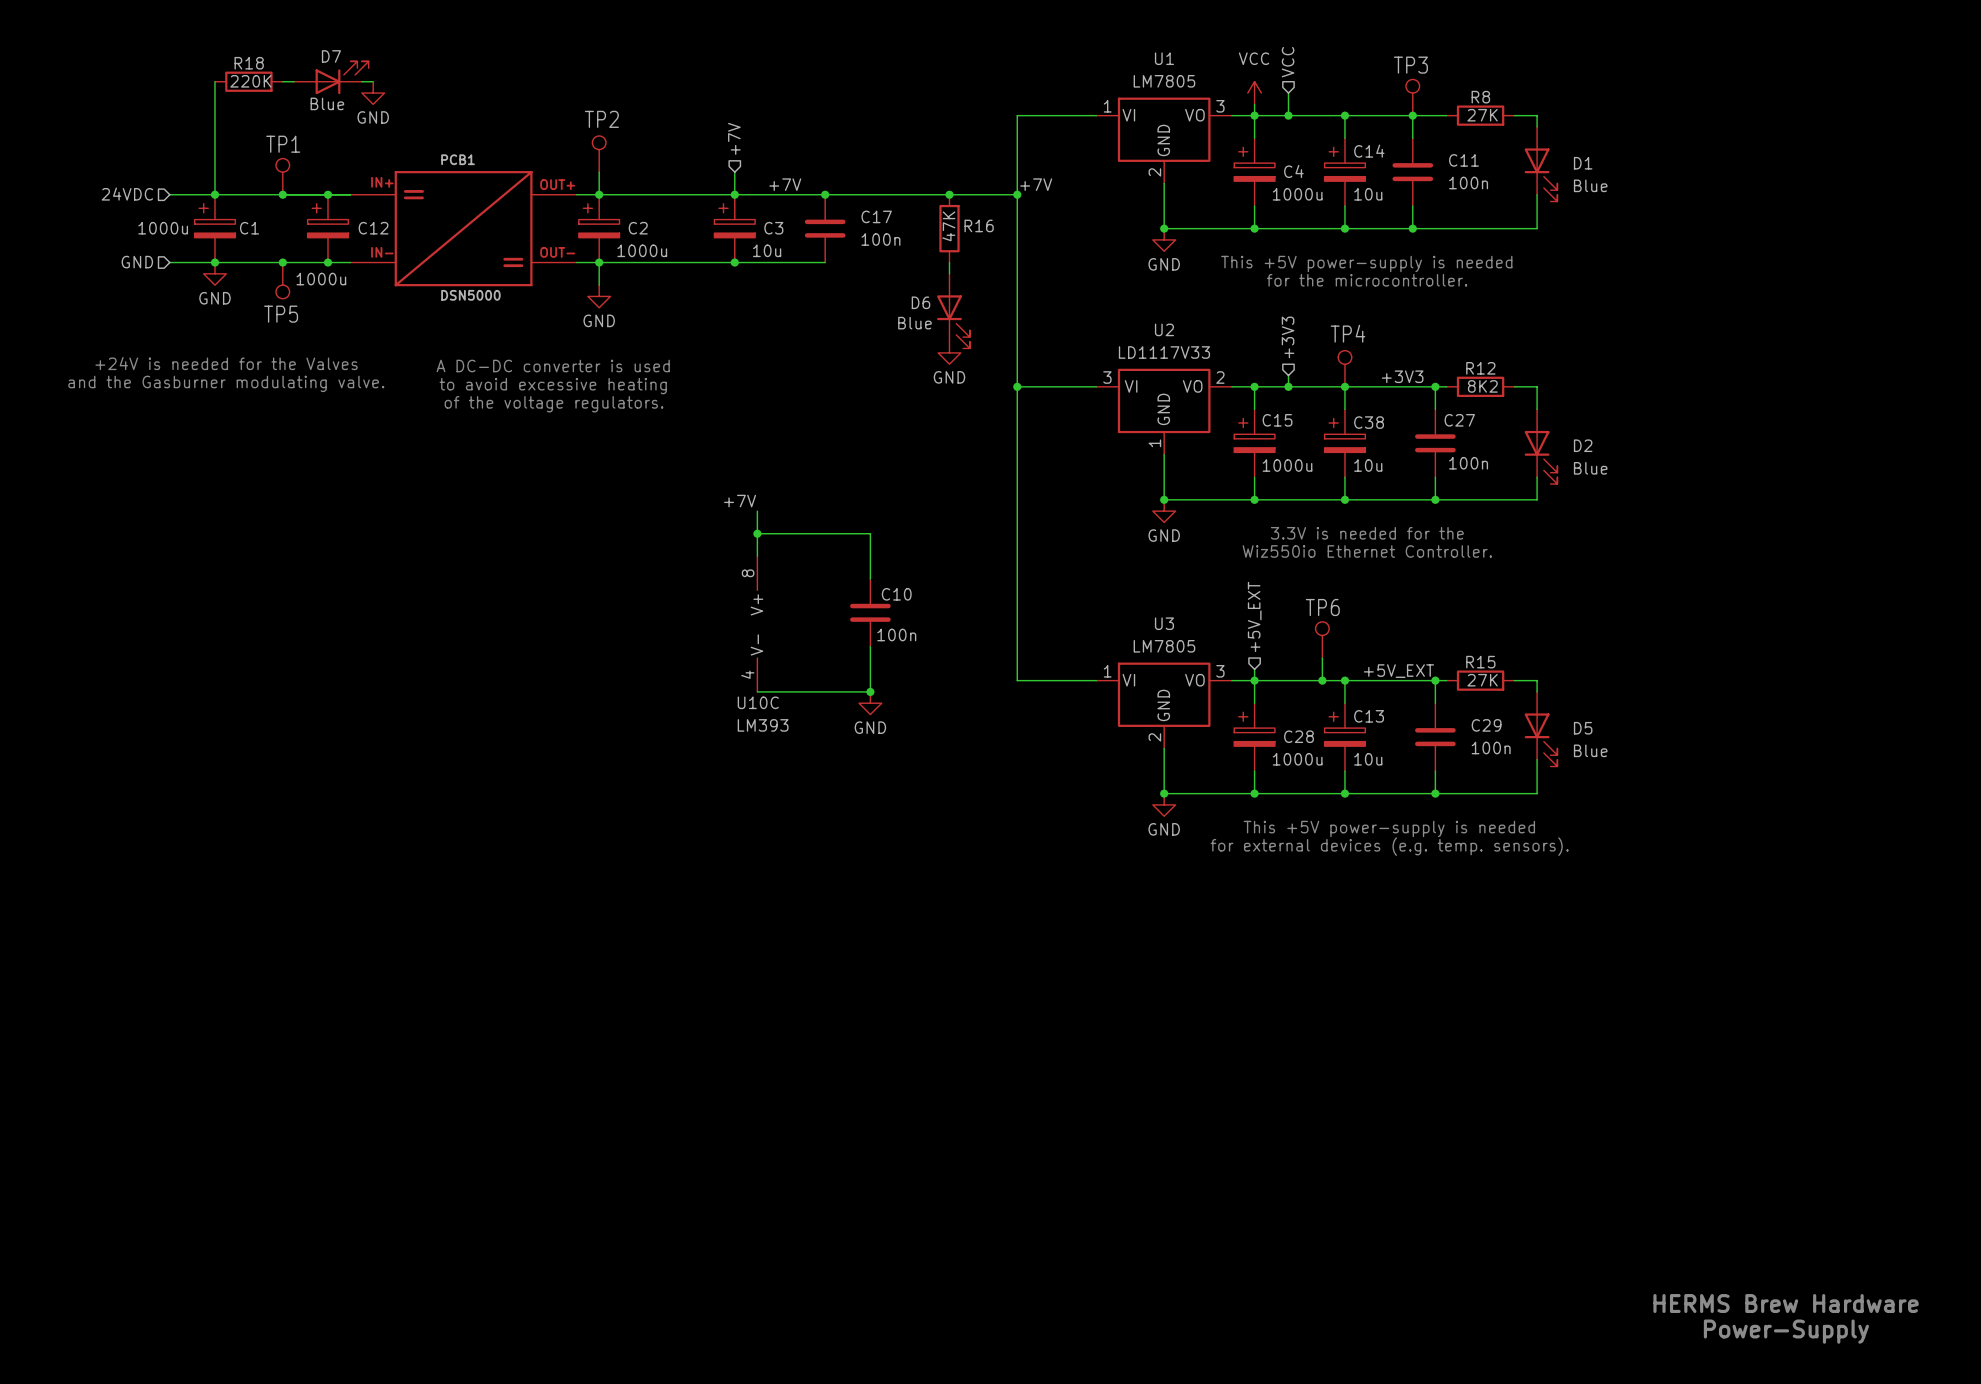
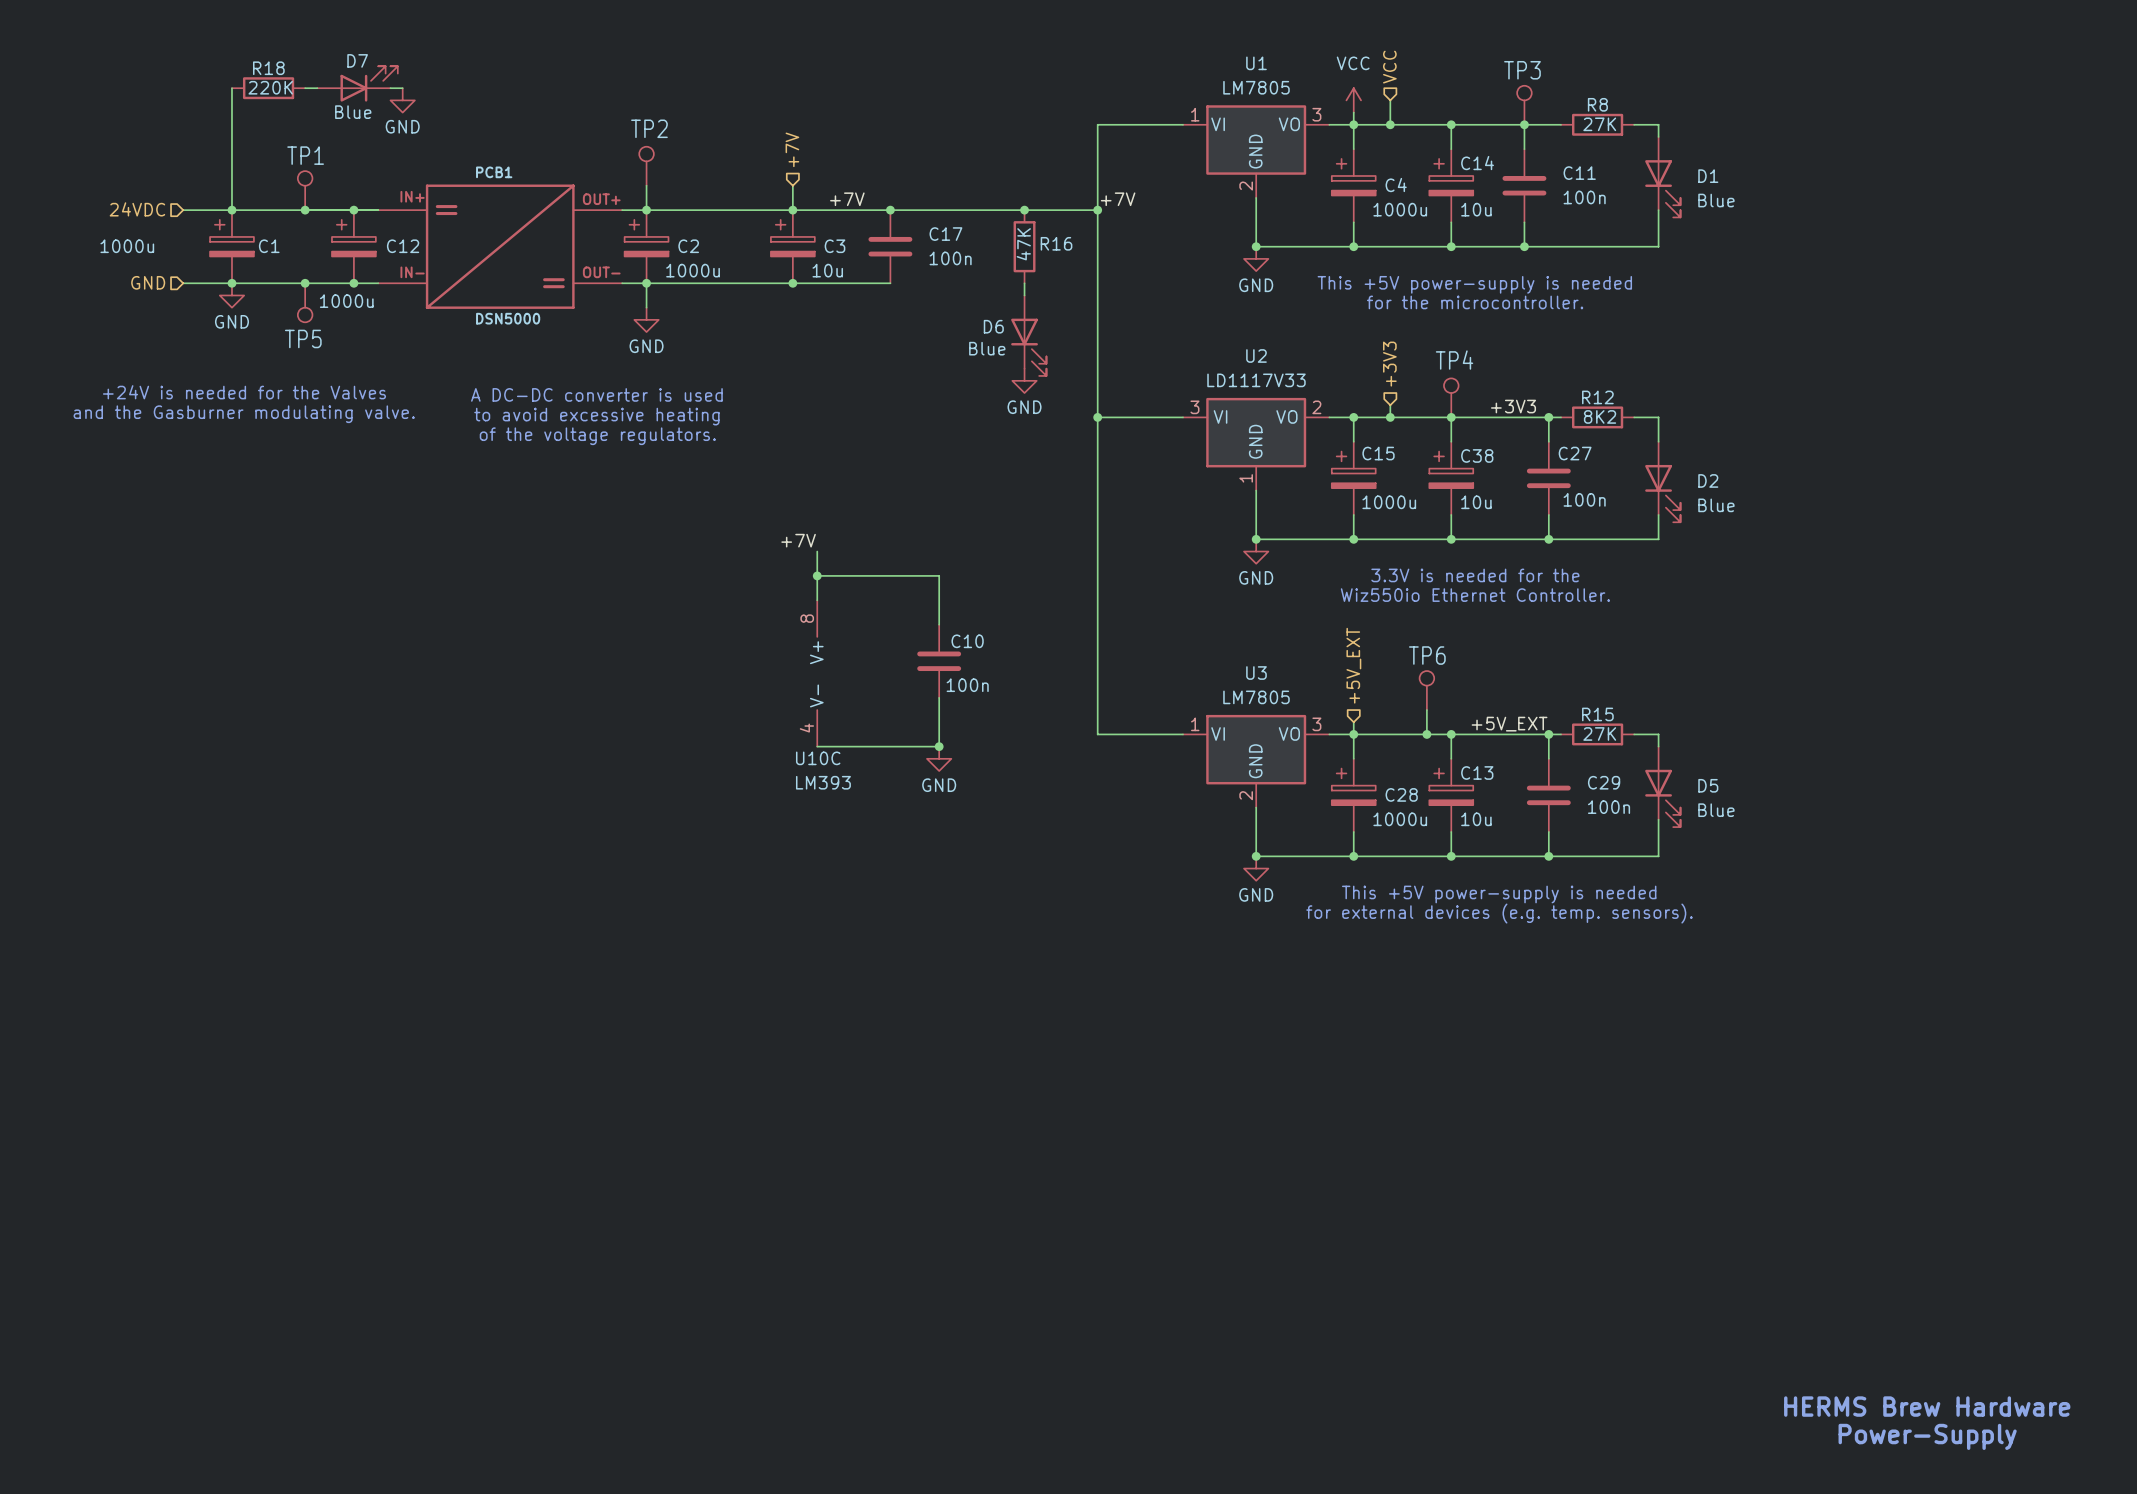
C1 value position: 1000u (163, 228) -> 1000u (127, 246)

